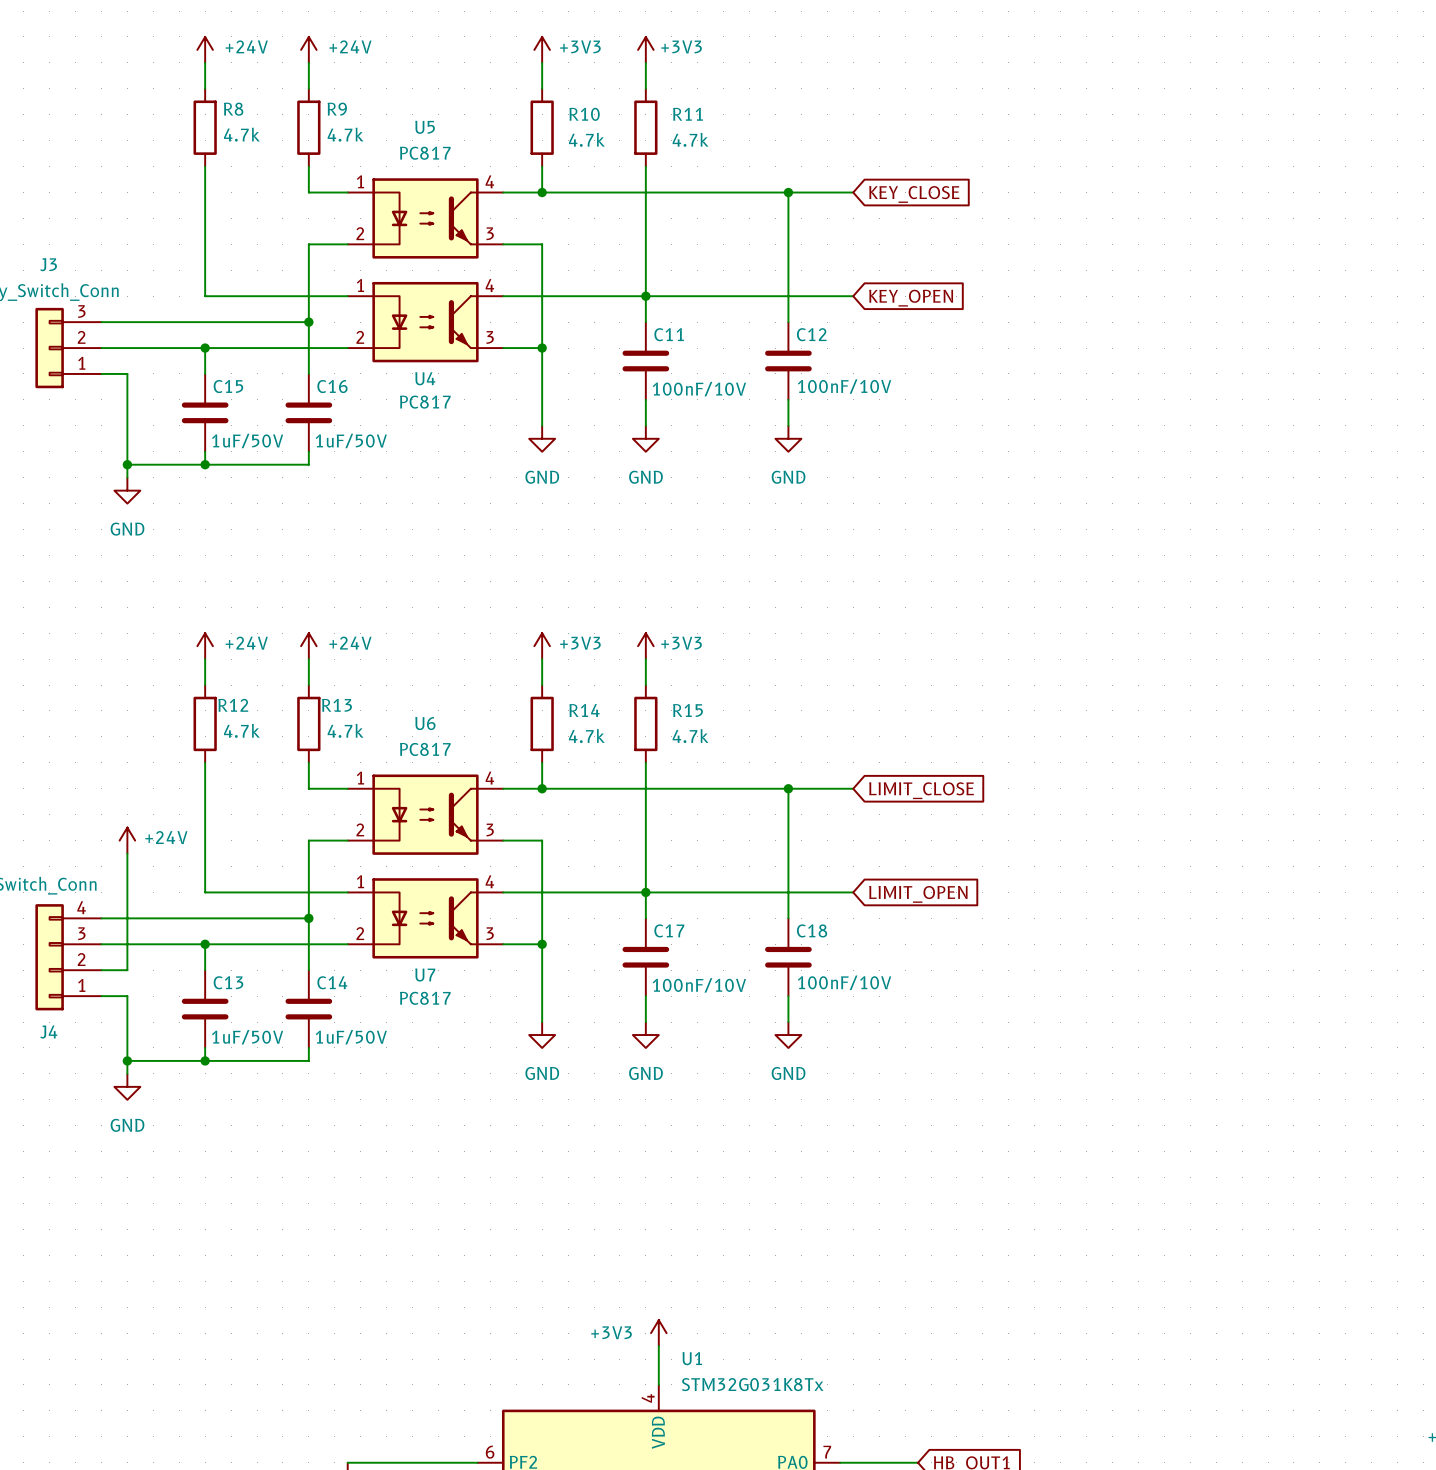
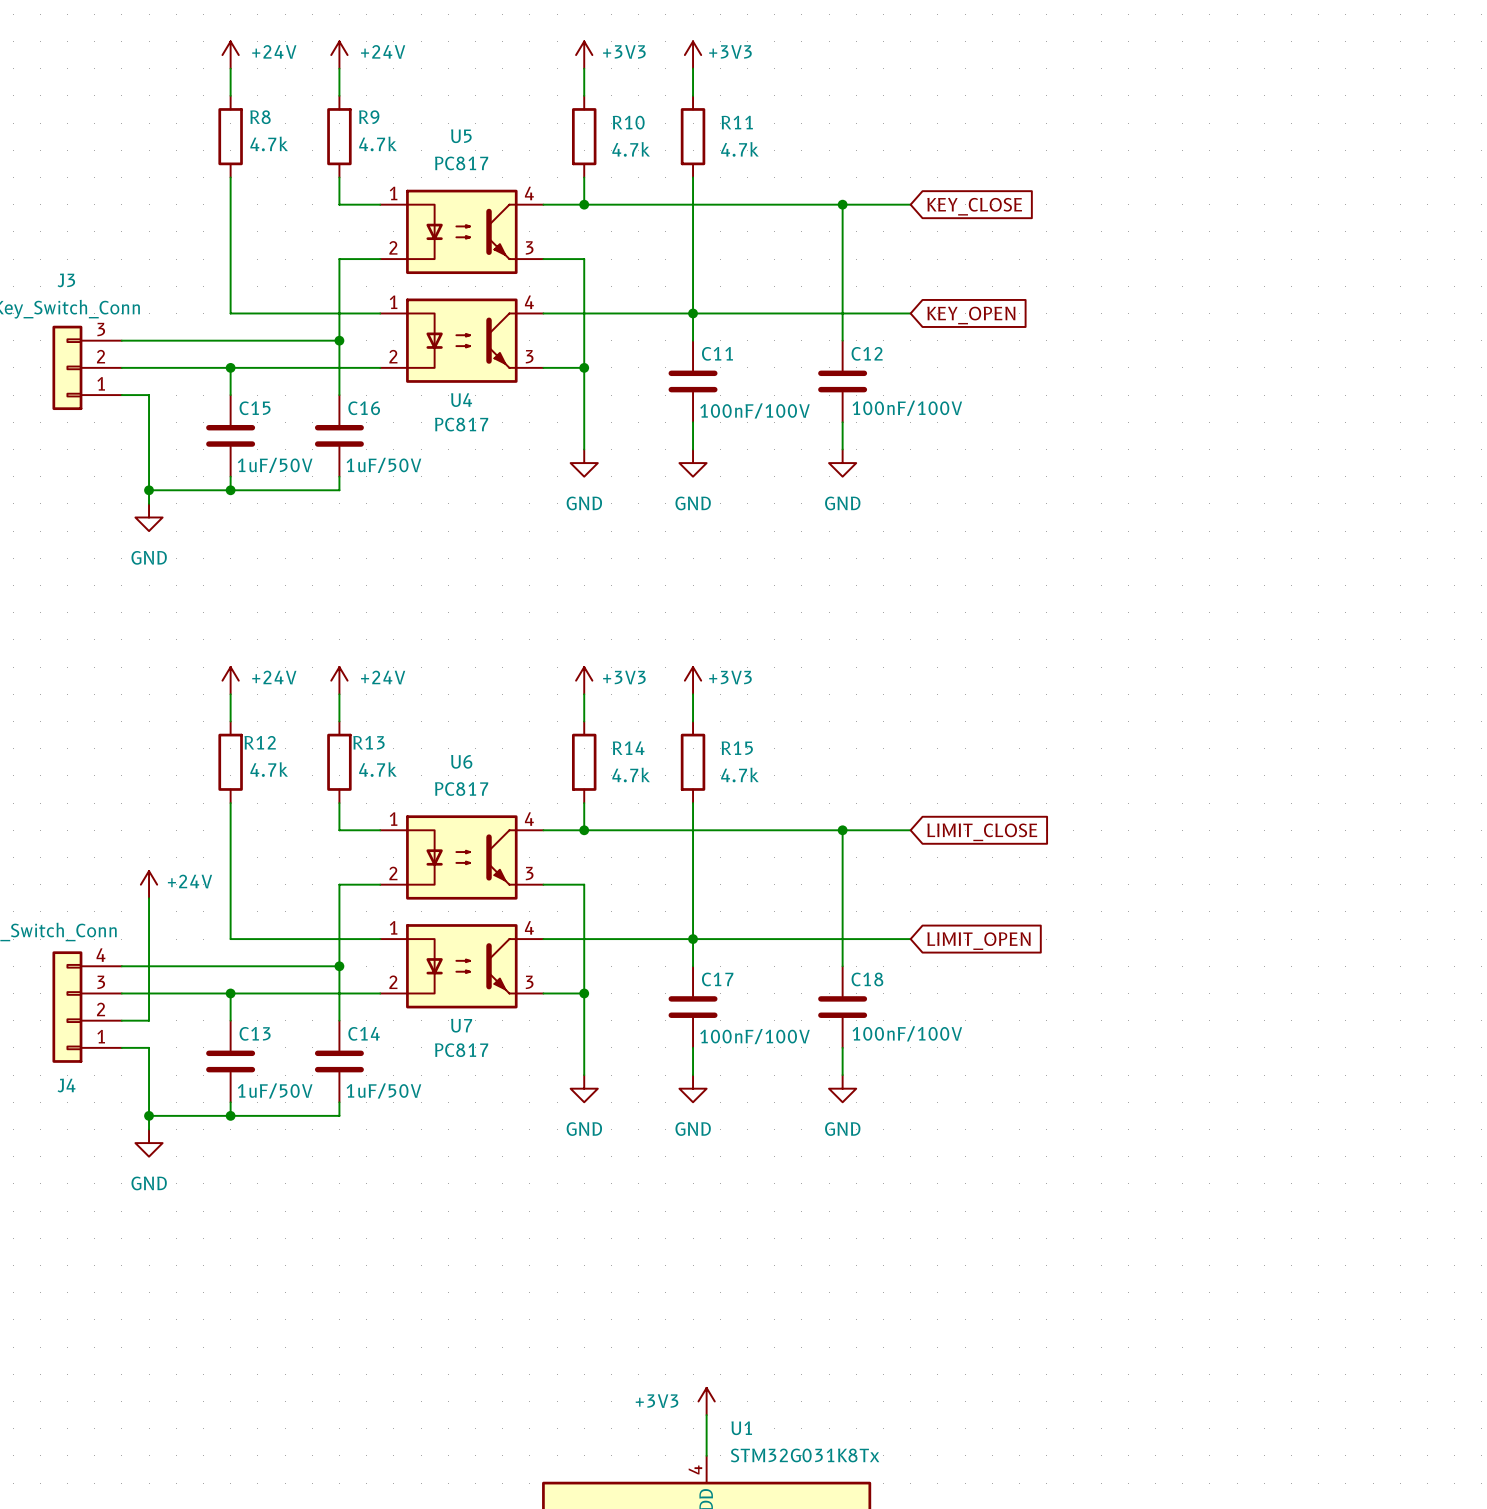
C12 value: 100nF/10V (844, 386) -> 100nF/100V (907, 408)
C11 value: 100nF/10V (699, 389) -> 100nF/100V (755, 410)
C18 value: 100nF/10V (844, 982) -> 100nF/100V (907, 1033)
C17 value: 100nF/10V (699, 985) -> 100nF/100V (755, 1036)

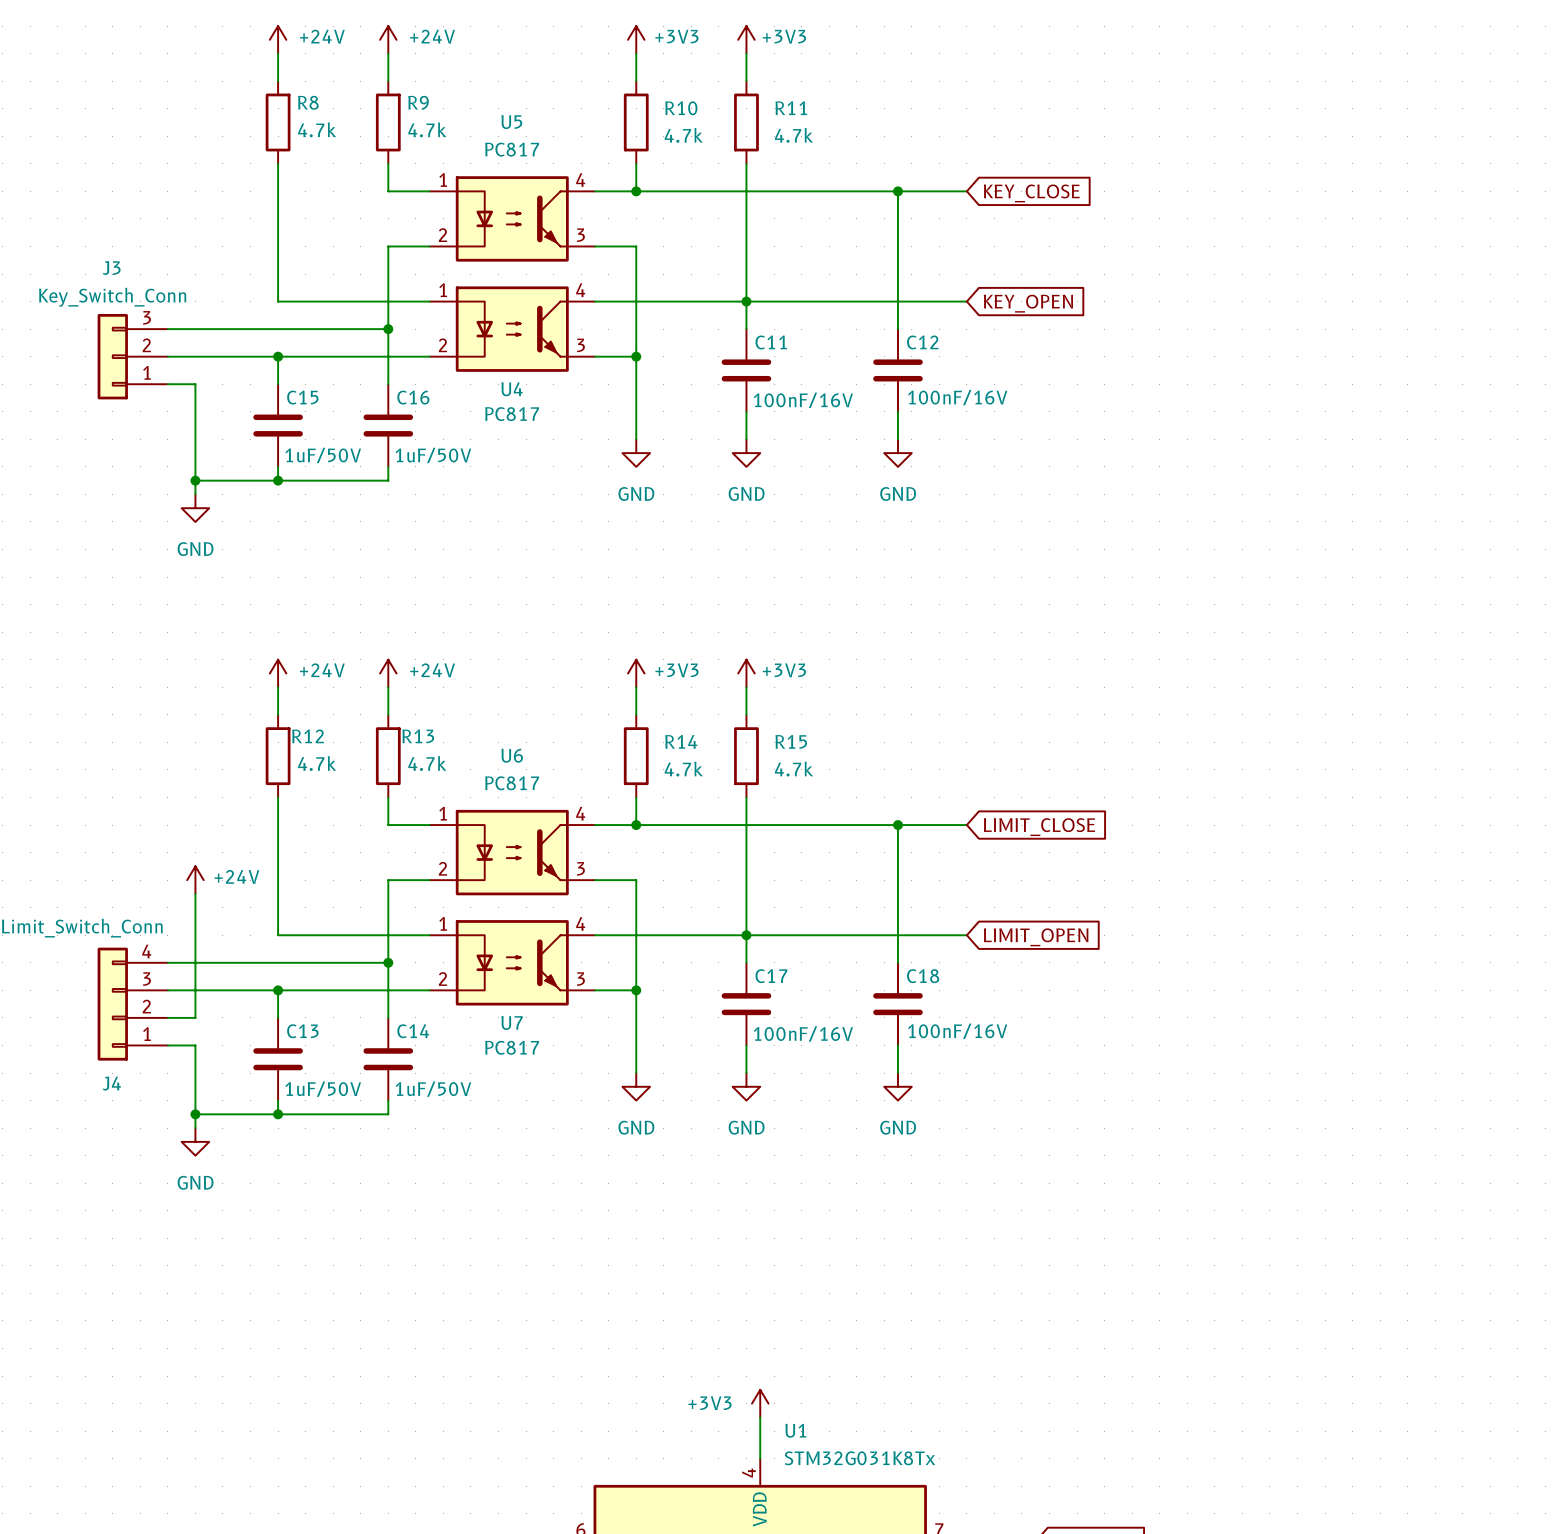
C12 value: 100nF/100V (907, 408) -> 100nF/16V (957, 397)
C11 value: 100nF/100V (755, 410) -> 100nF/16V (803, 400)
C18 value: 100nF/100V (907, 1033) -> 100nF/16V (957, 1031)
C17 value: 100nF/100V (755, 1036) -> 100nF/16V (803, 1034)

